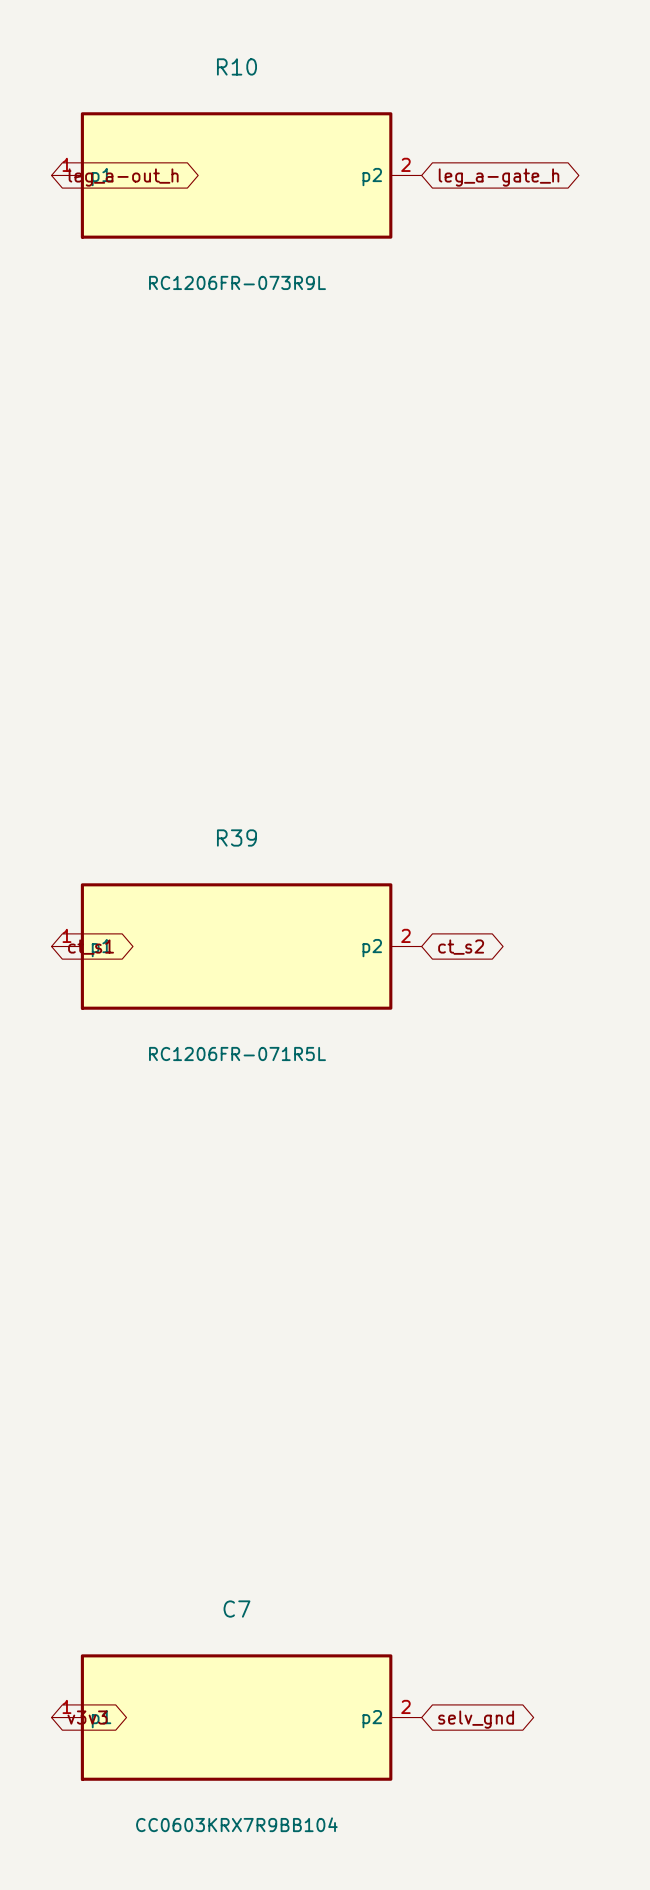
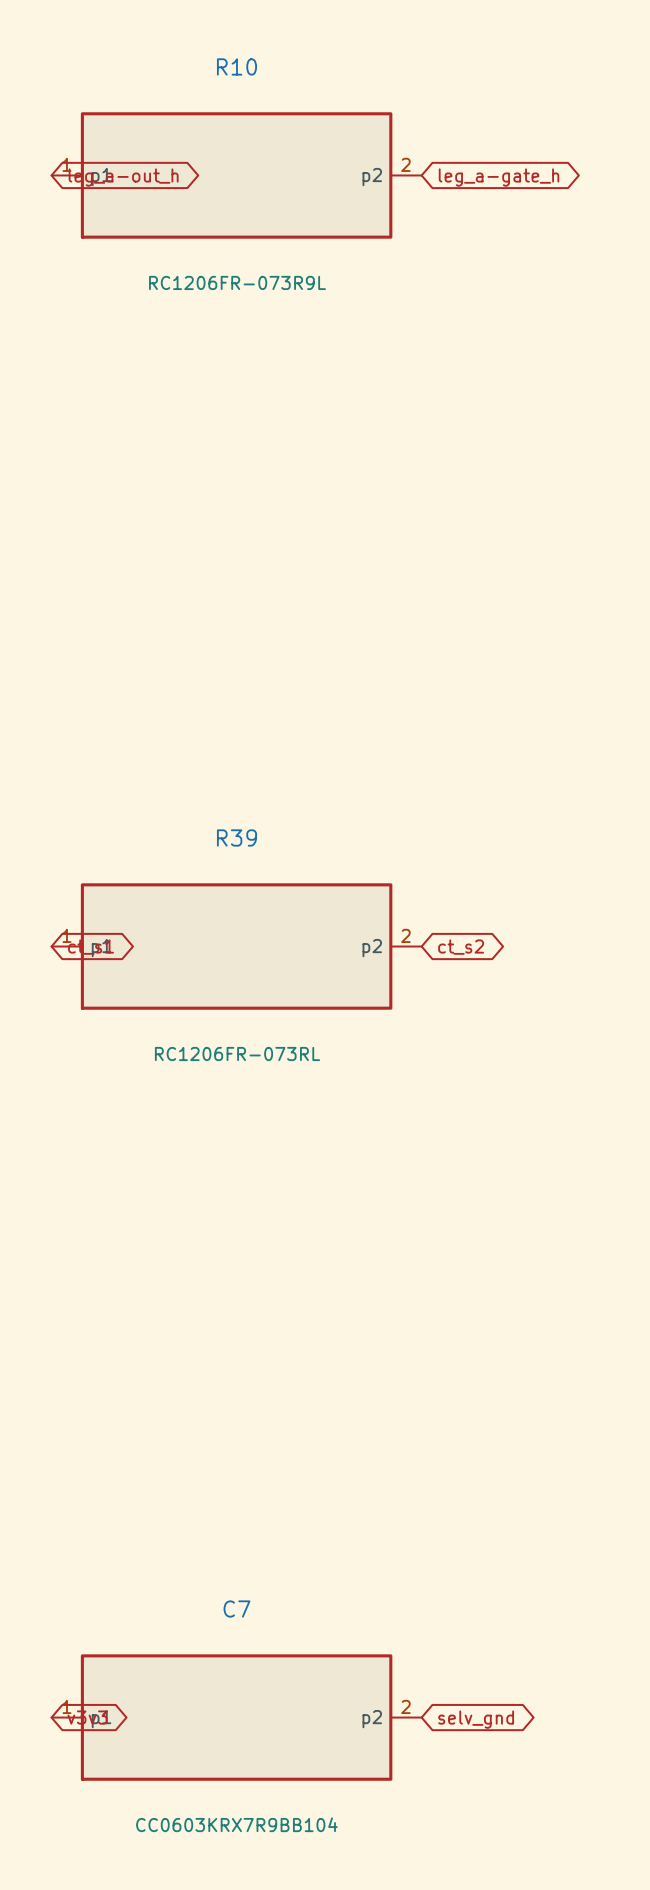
R39 value: RC1206FR-071R5L (237, 1053) -> RC1206FR-073RL (237, 1053)

